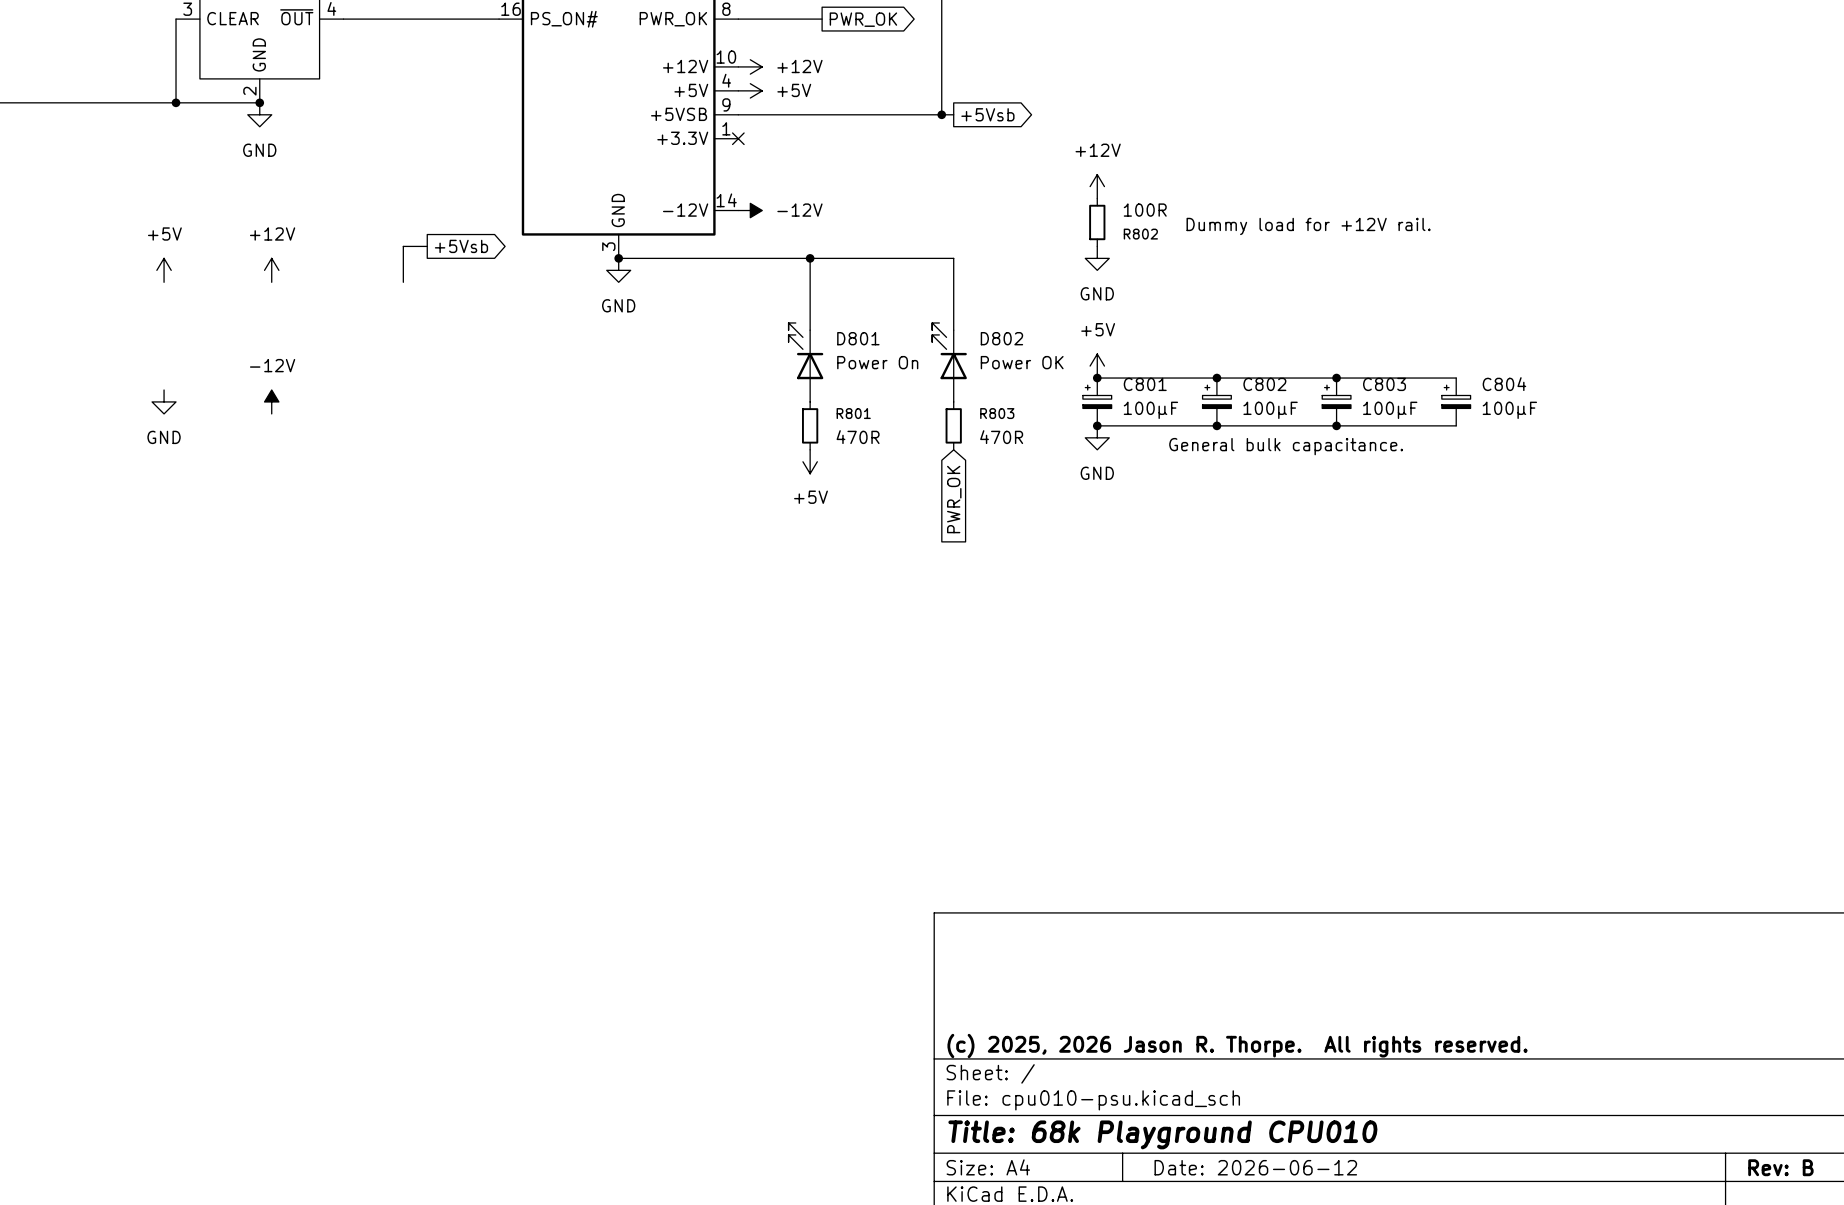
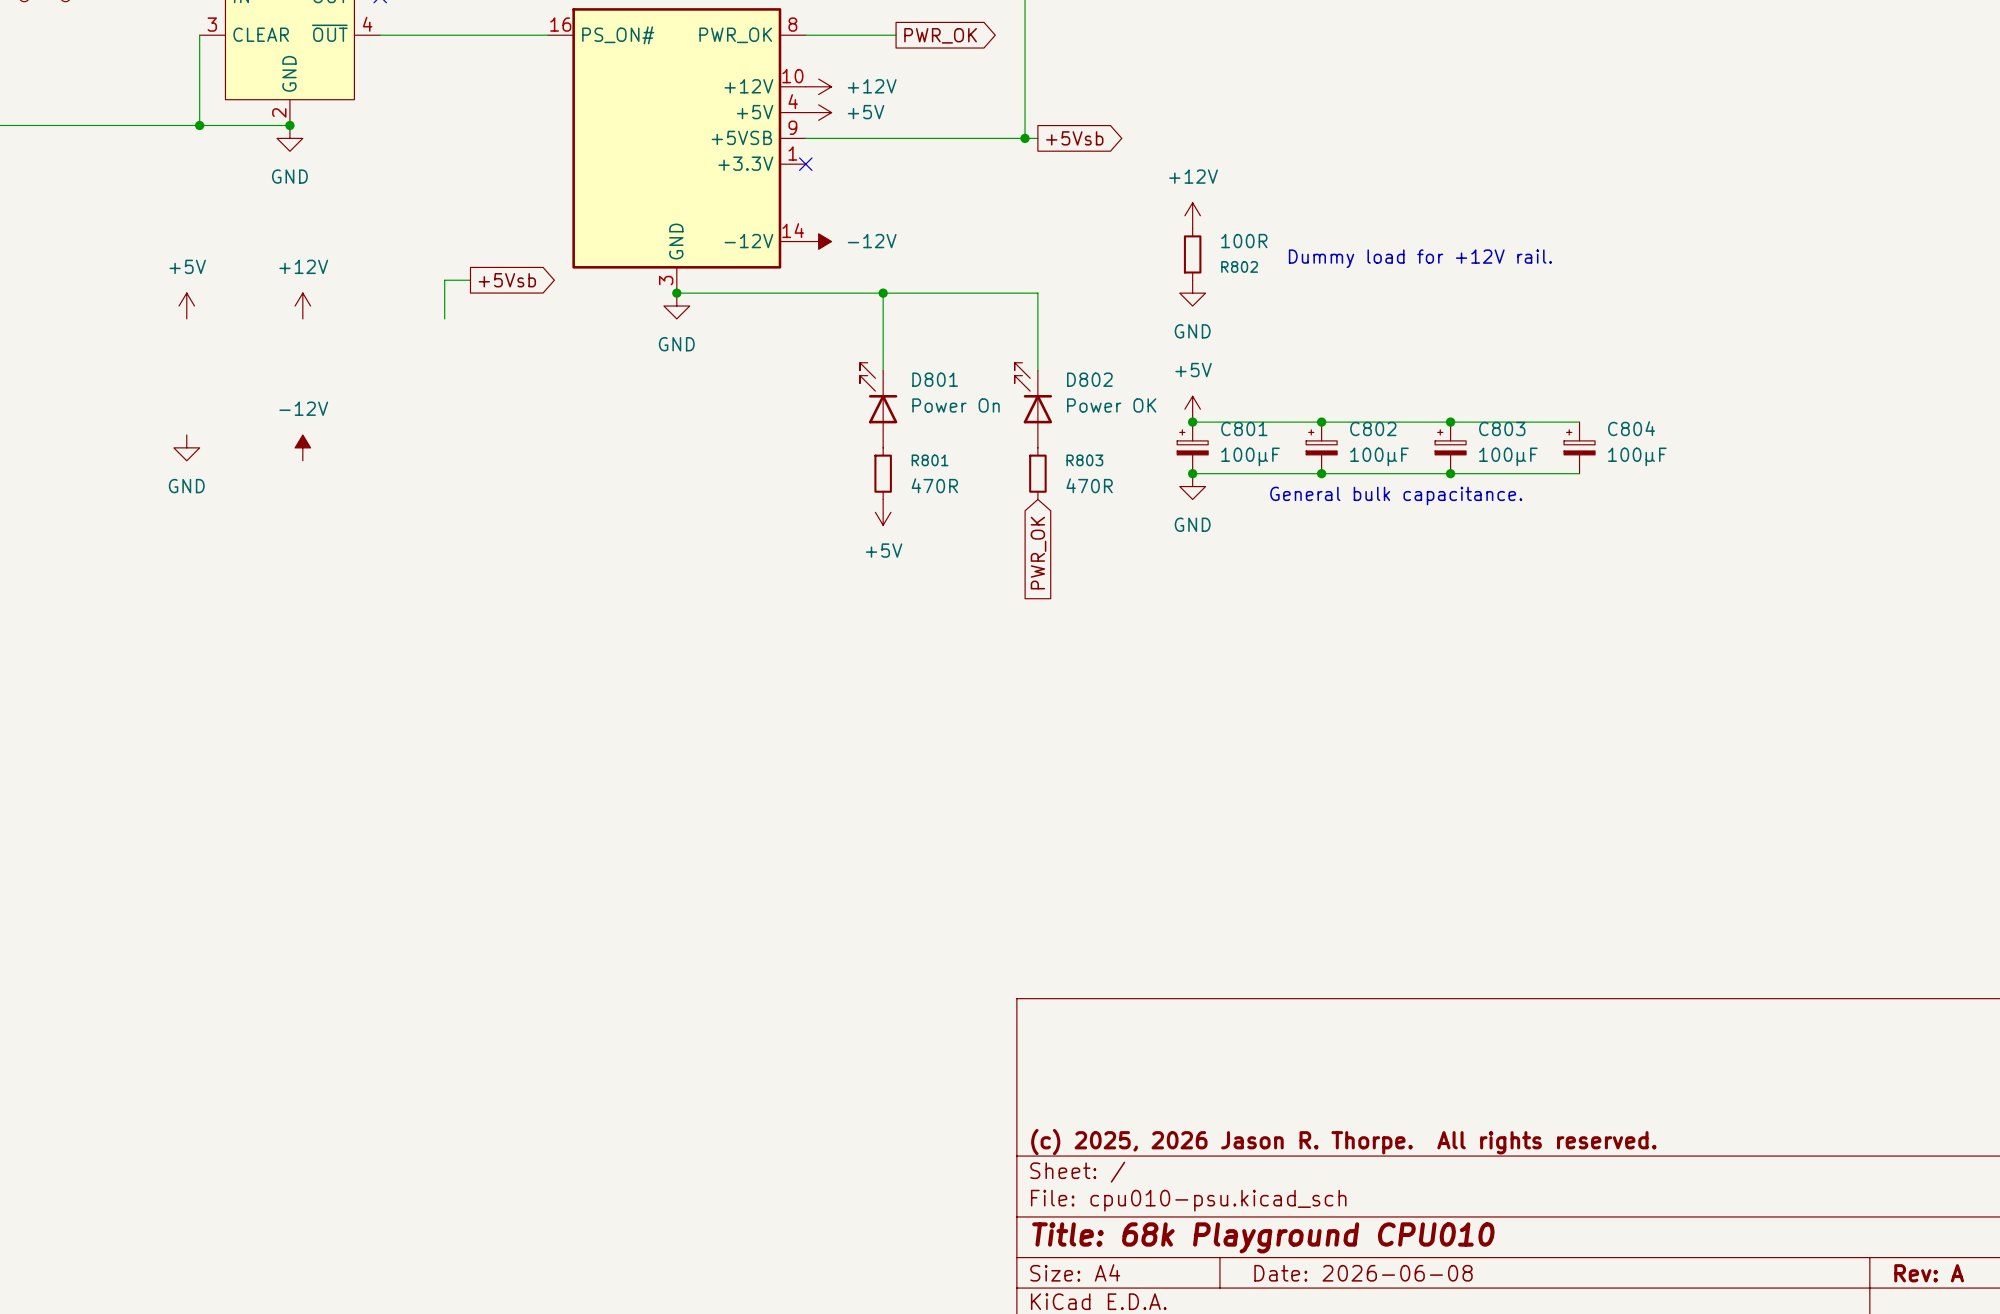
title block: Date: 2026-06-12 (1255, 1167) -> Date: 2026-06-08 (1363, 1273)
title block: Rev: B (1780, 1167) -> Rev: A (1929, 1273)

